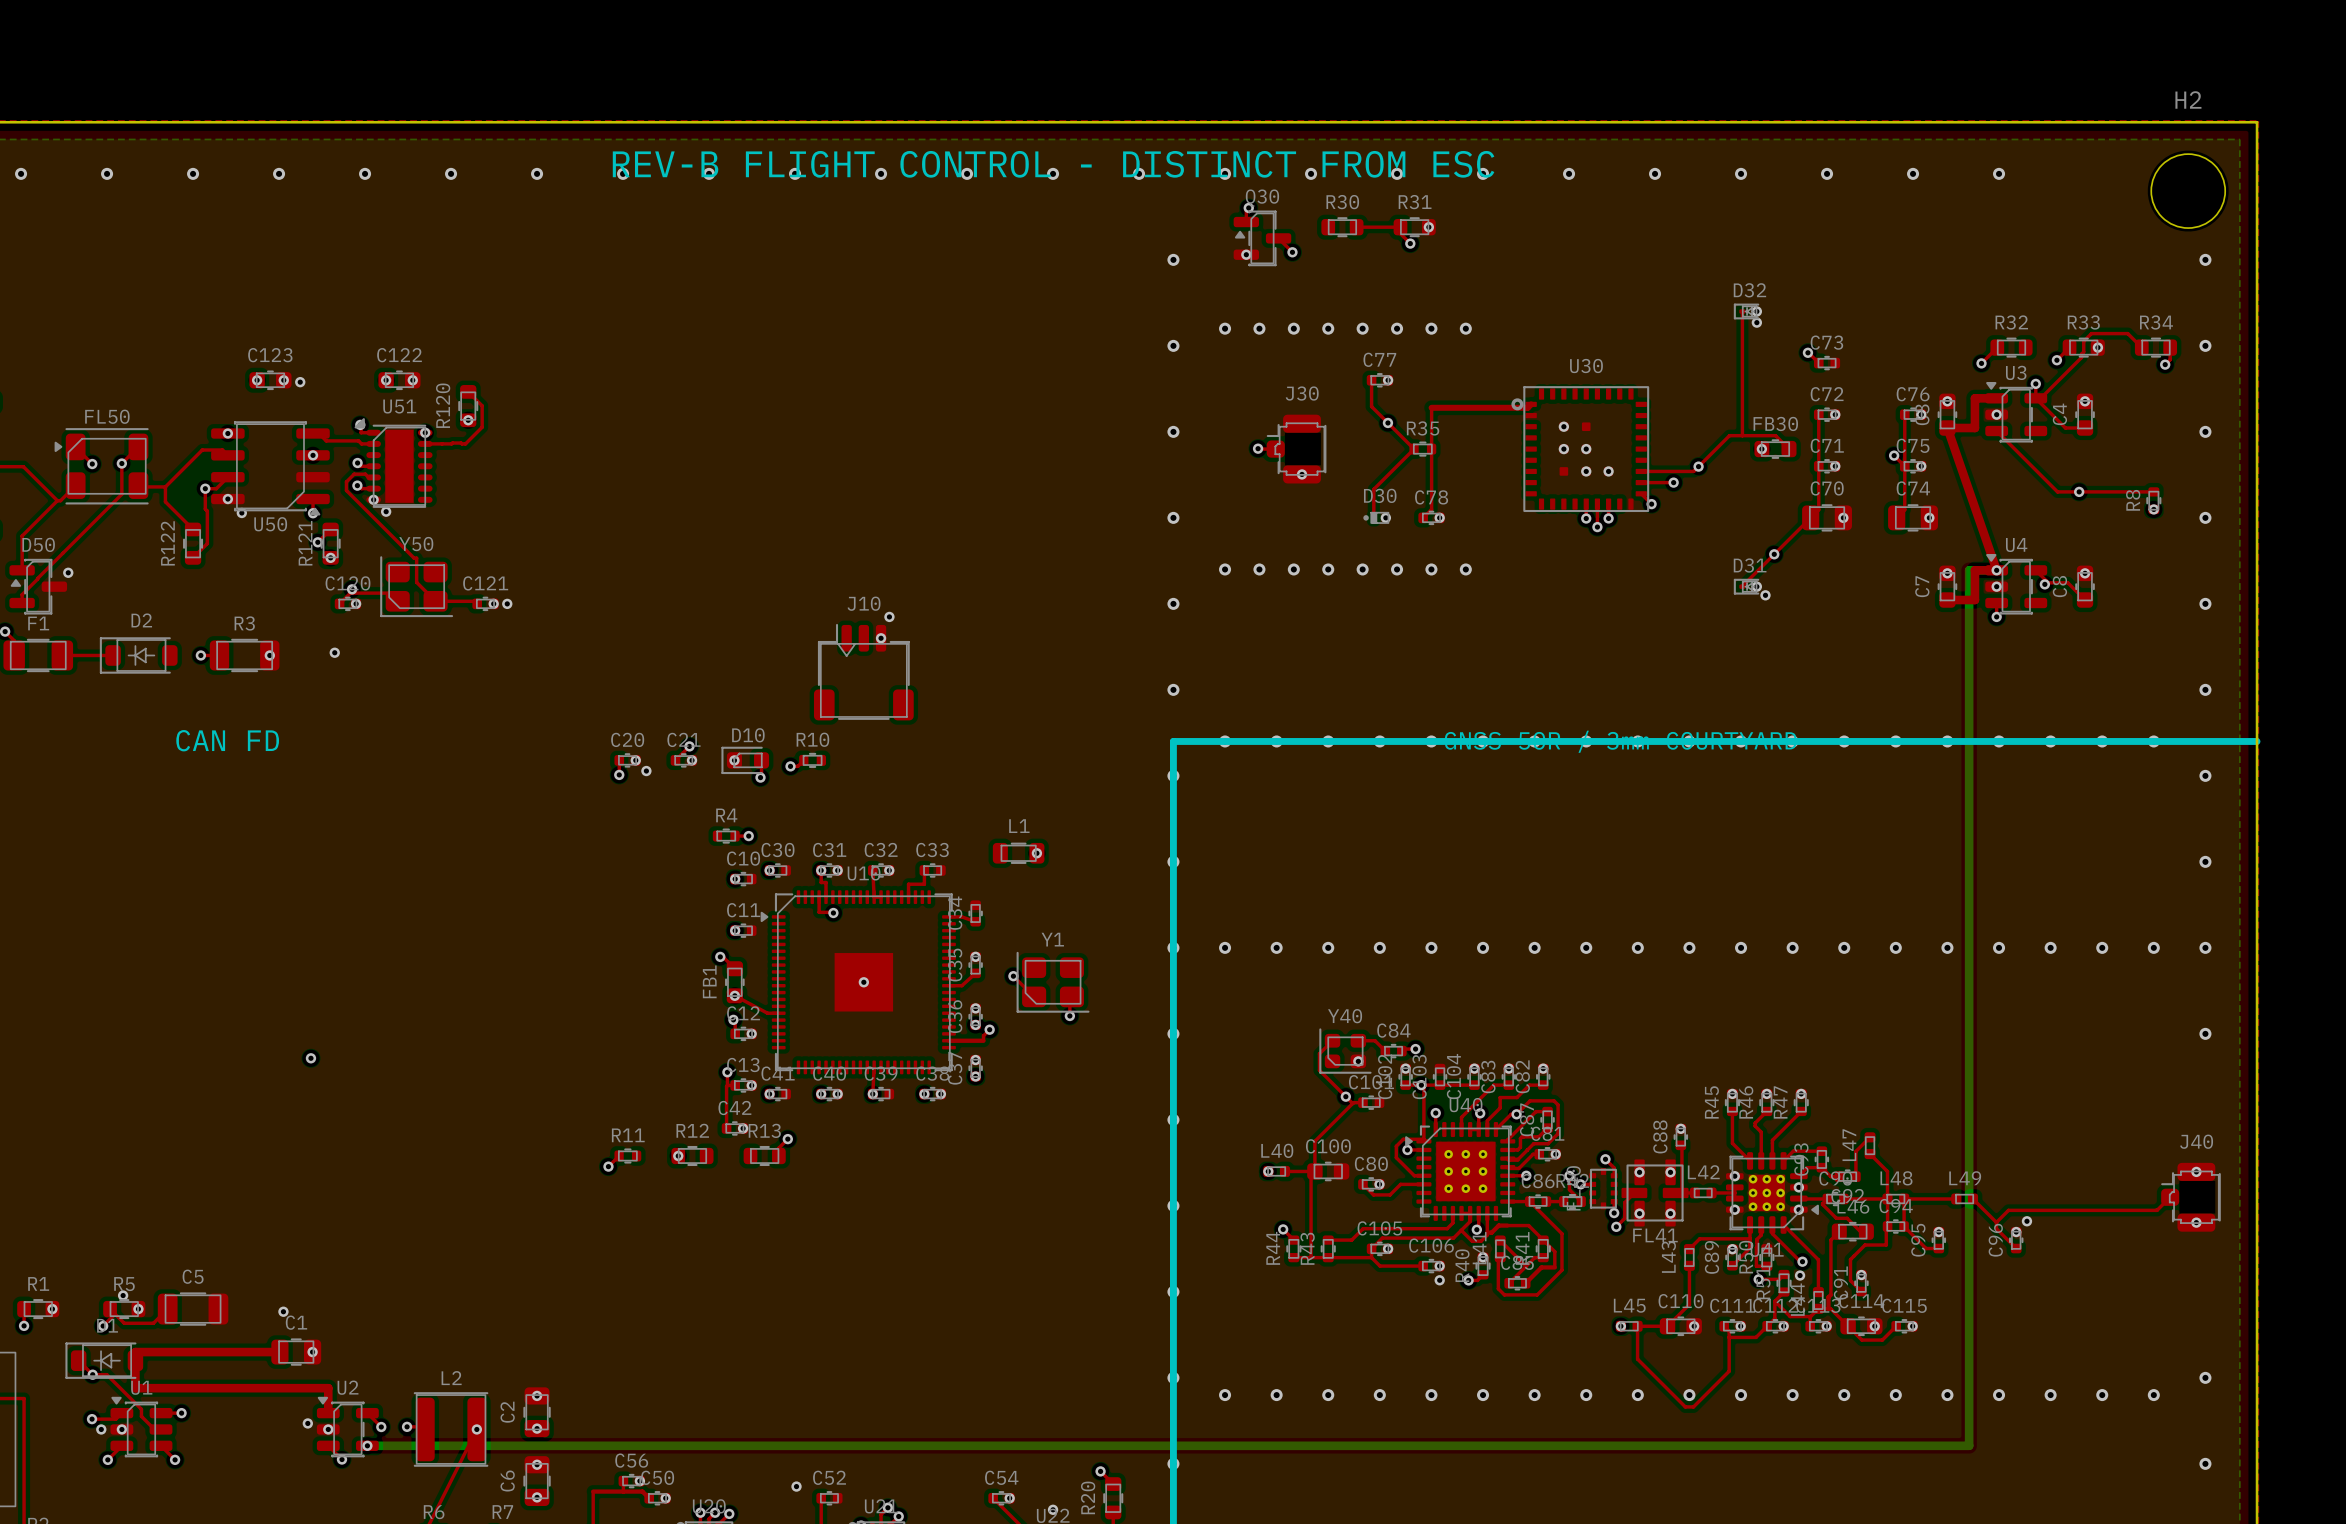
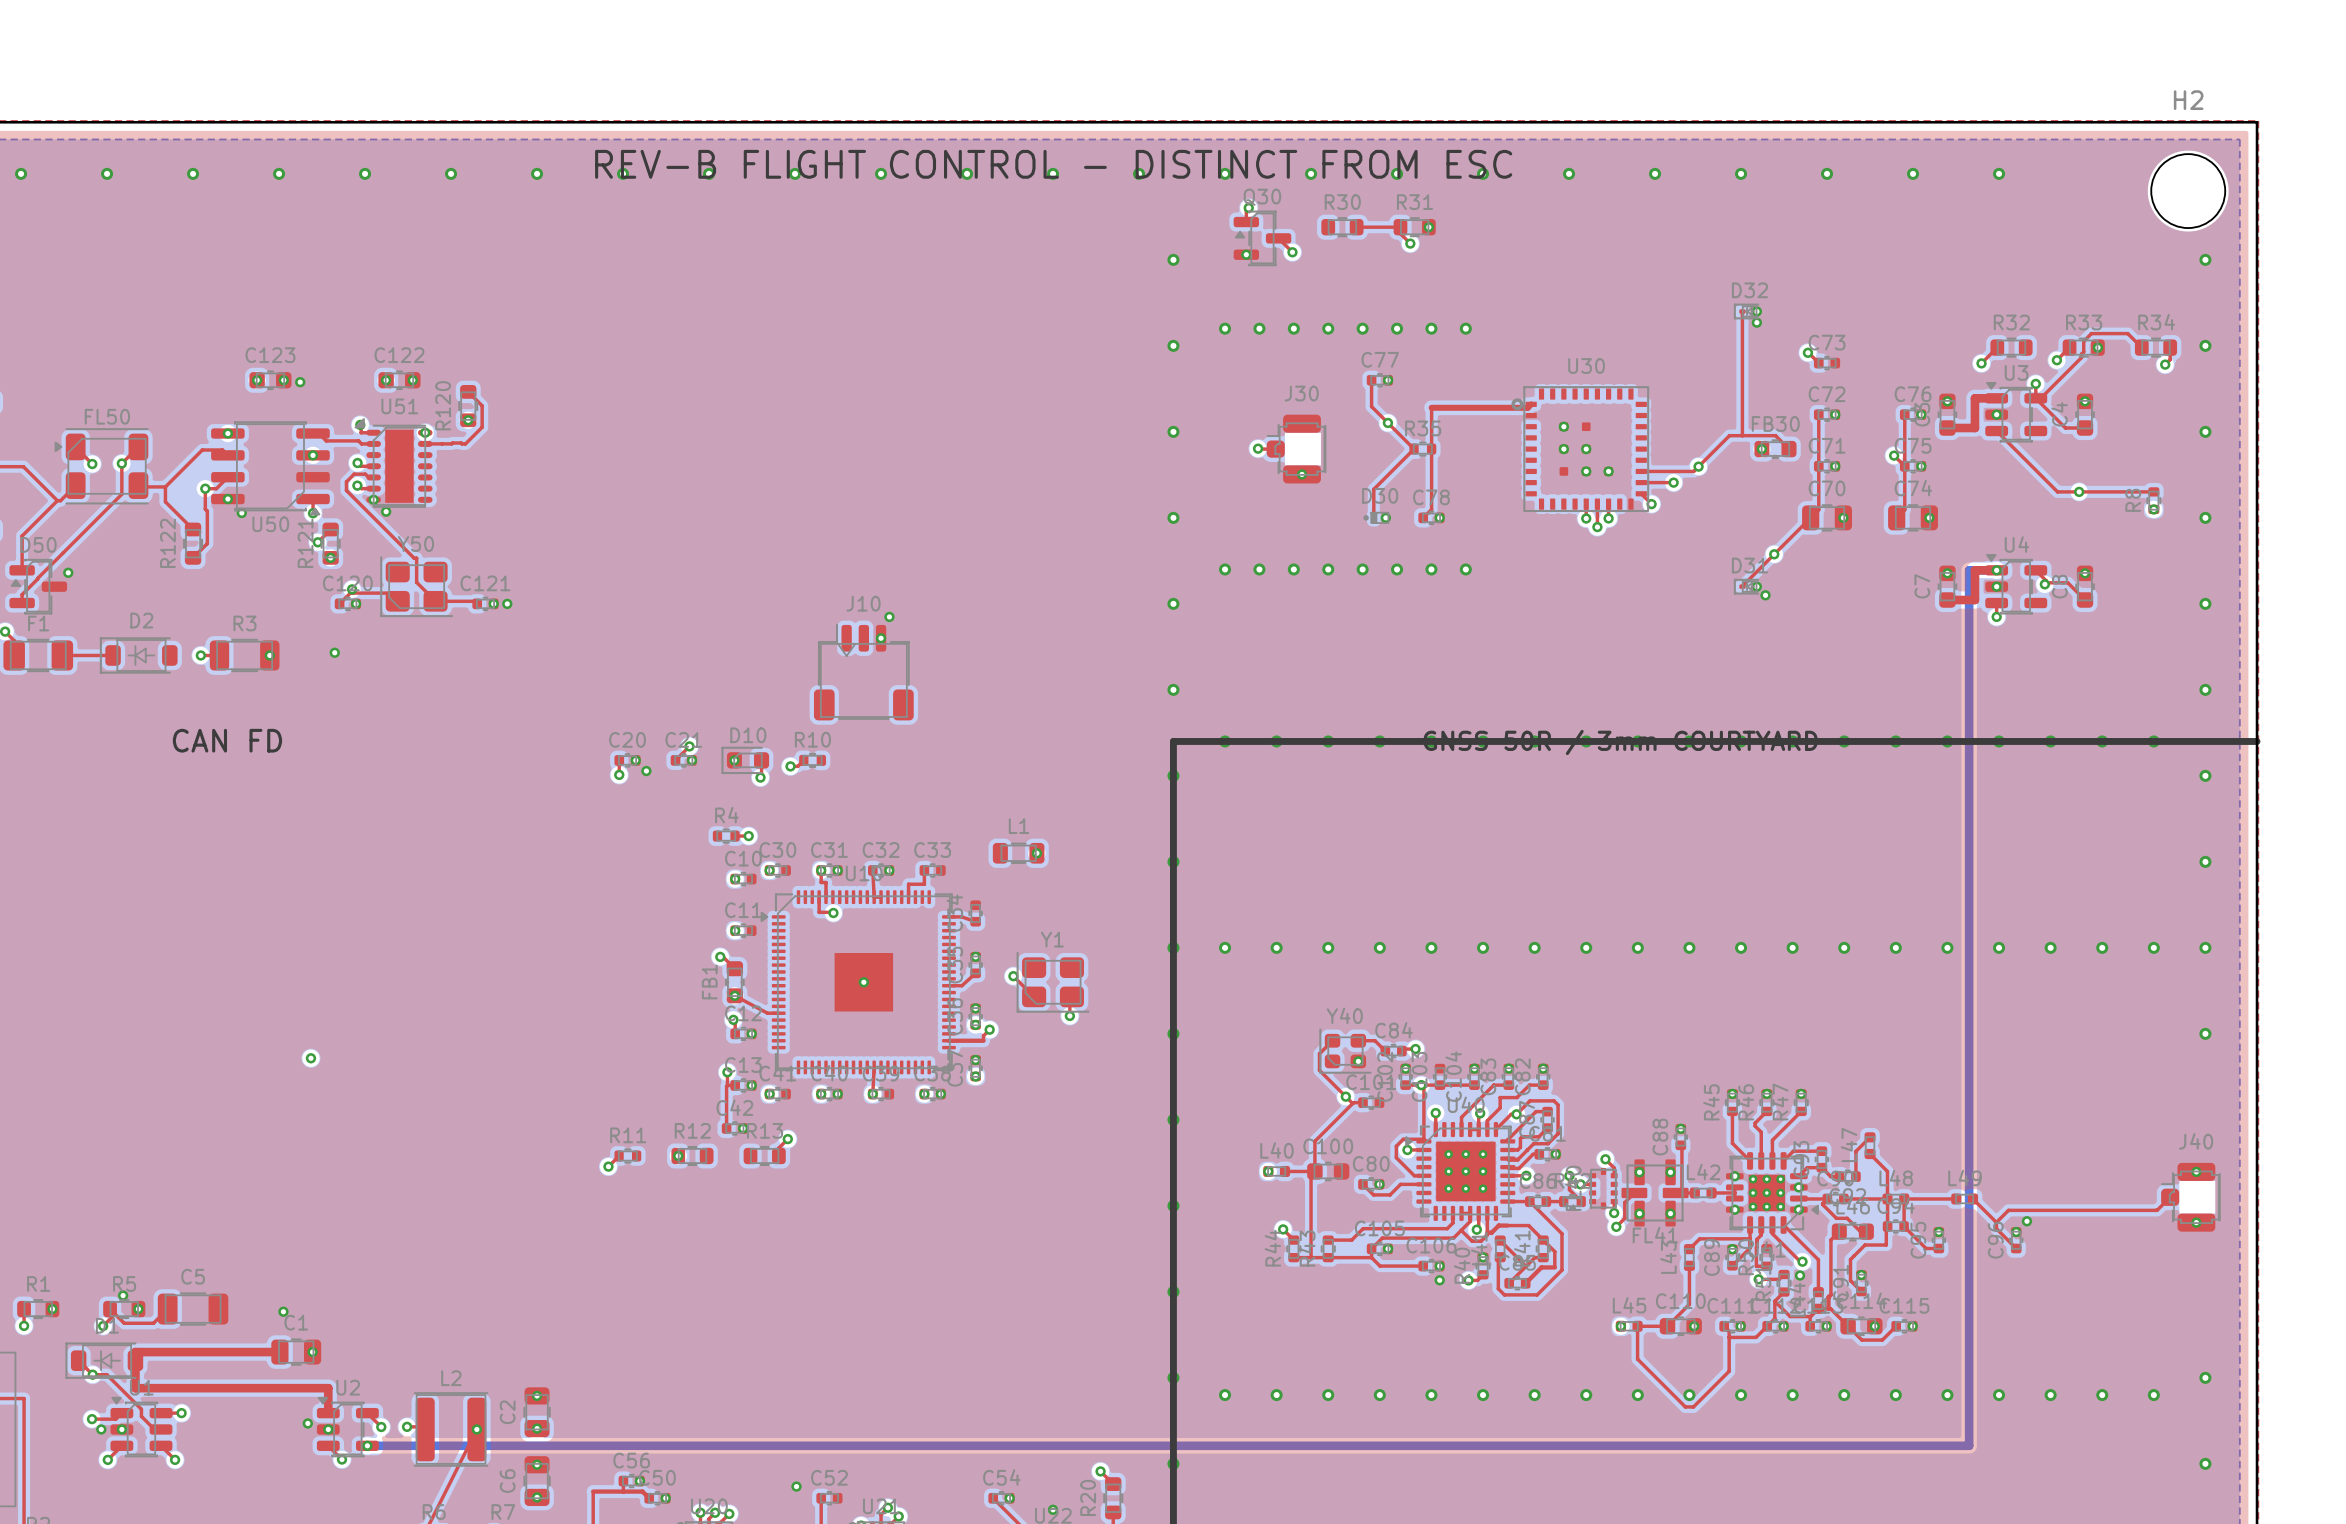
top track: (1947, 428) (1996, 570) -> none

